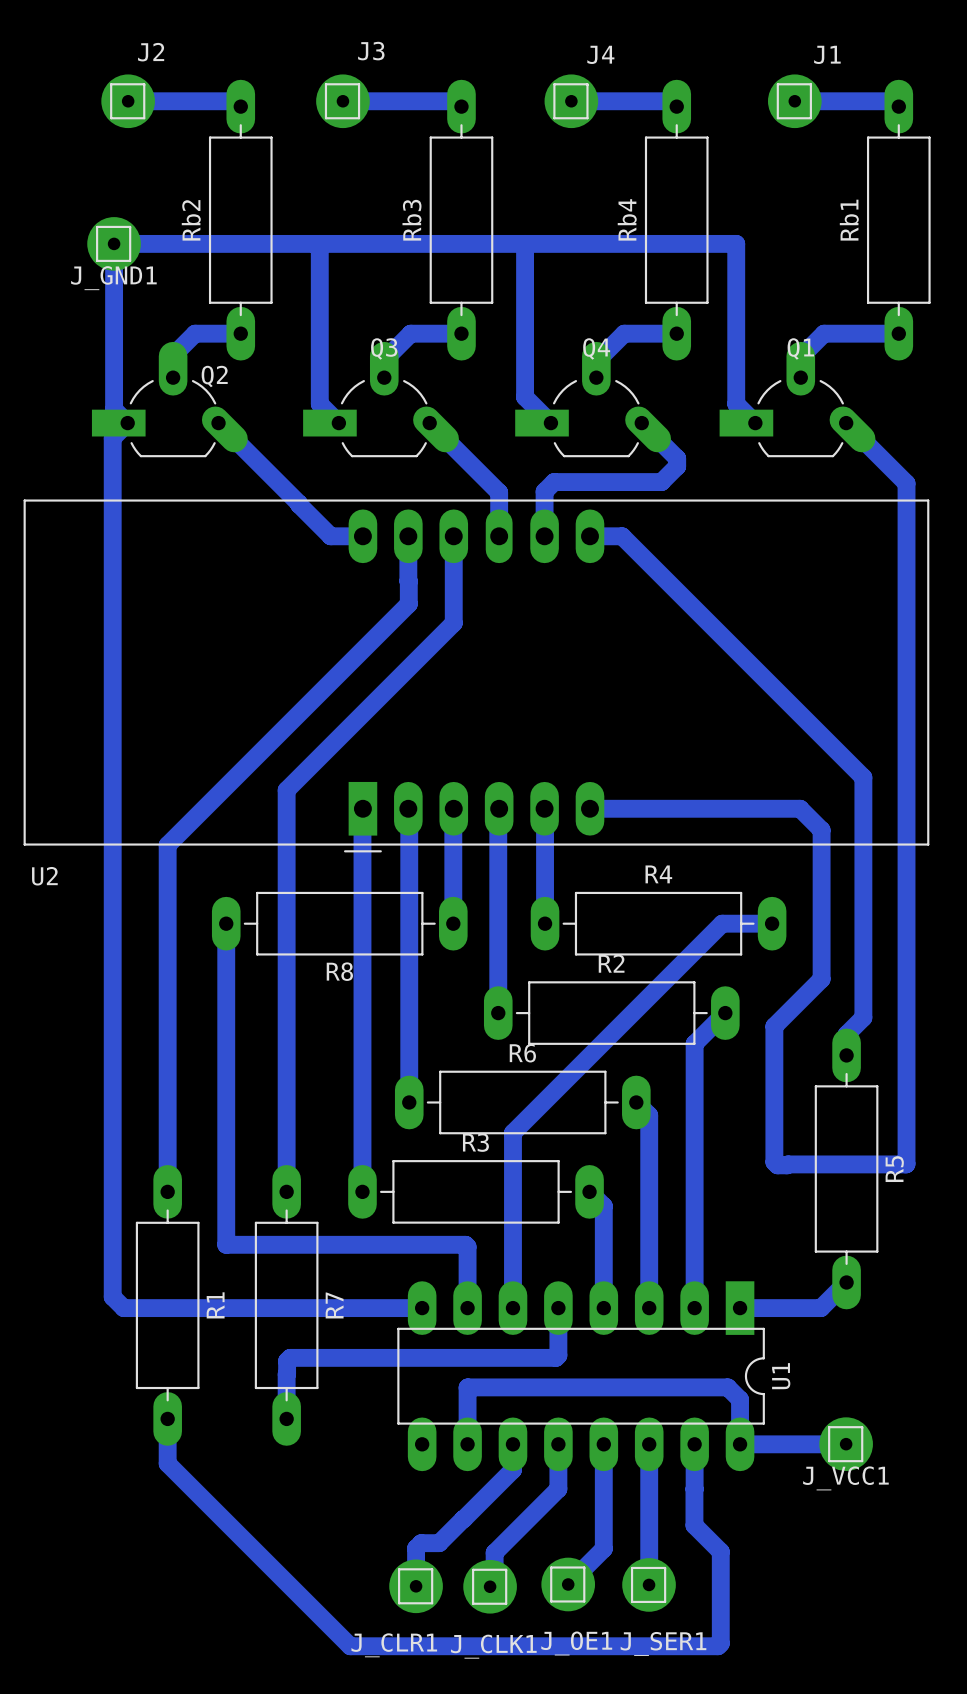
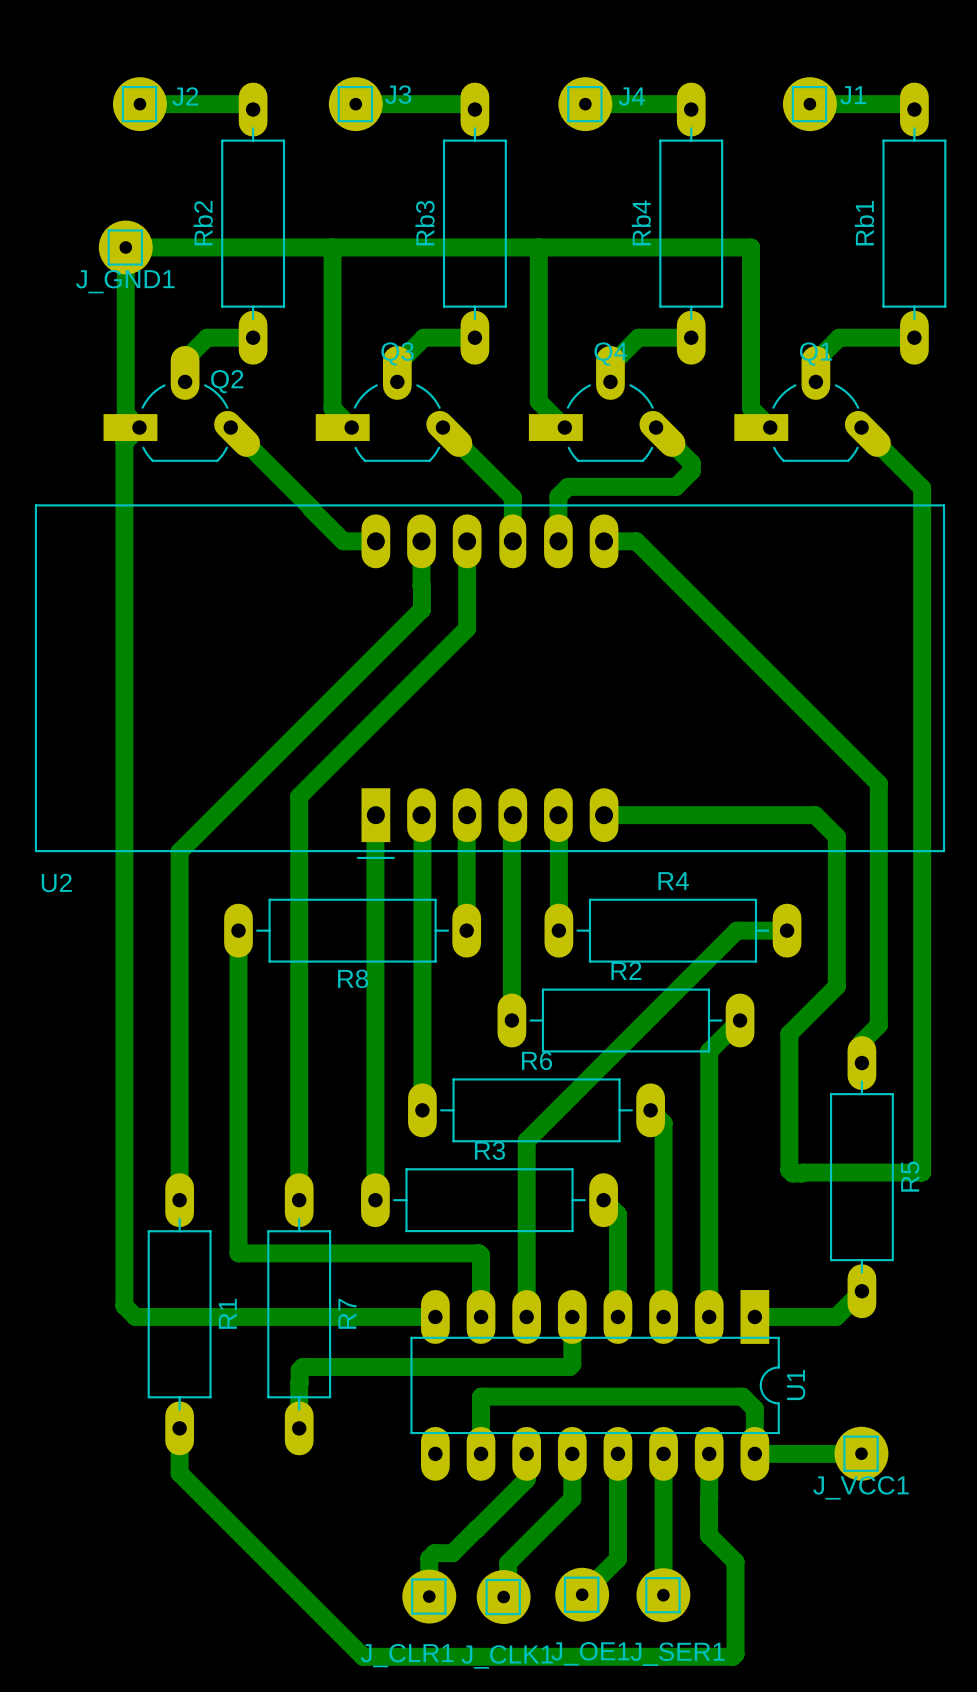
J3 name position: J3 (371, 51) -> J3 (398, 94)
J2 name position: J2 (151, 52) -> J2 (185, 96)
J4 name position: J4 (600, 54) -> J4 (631, 96)
J1 name position: J1 (827, 54) -> J1 (853, 95)

